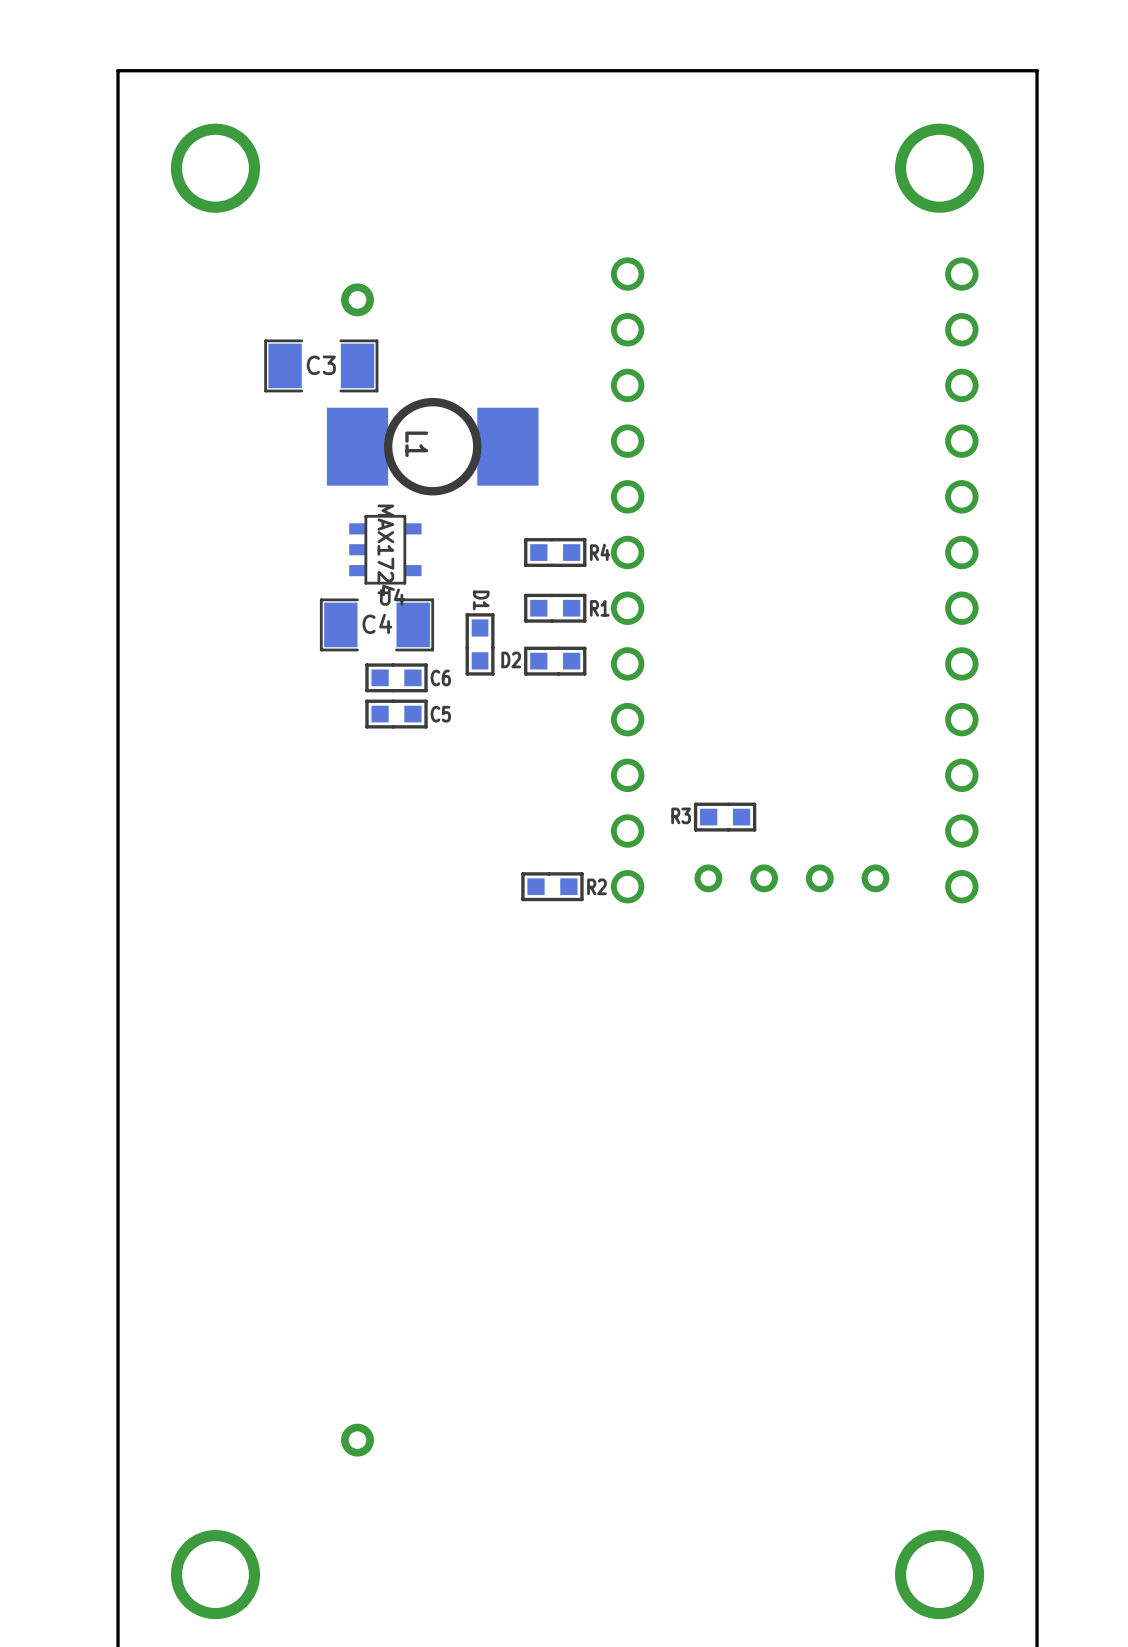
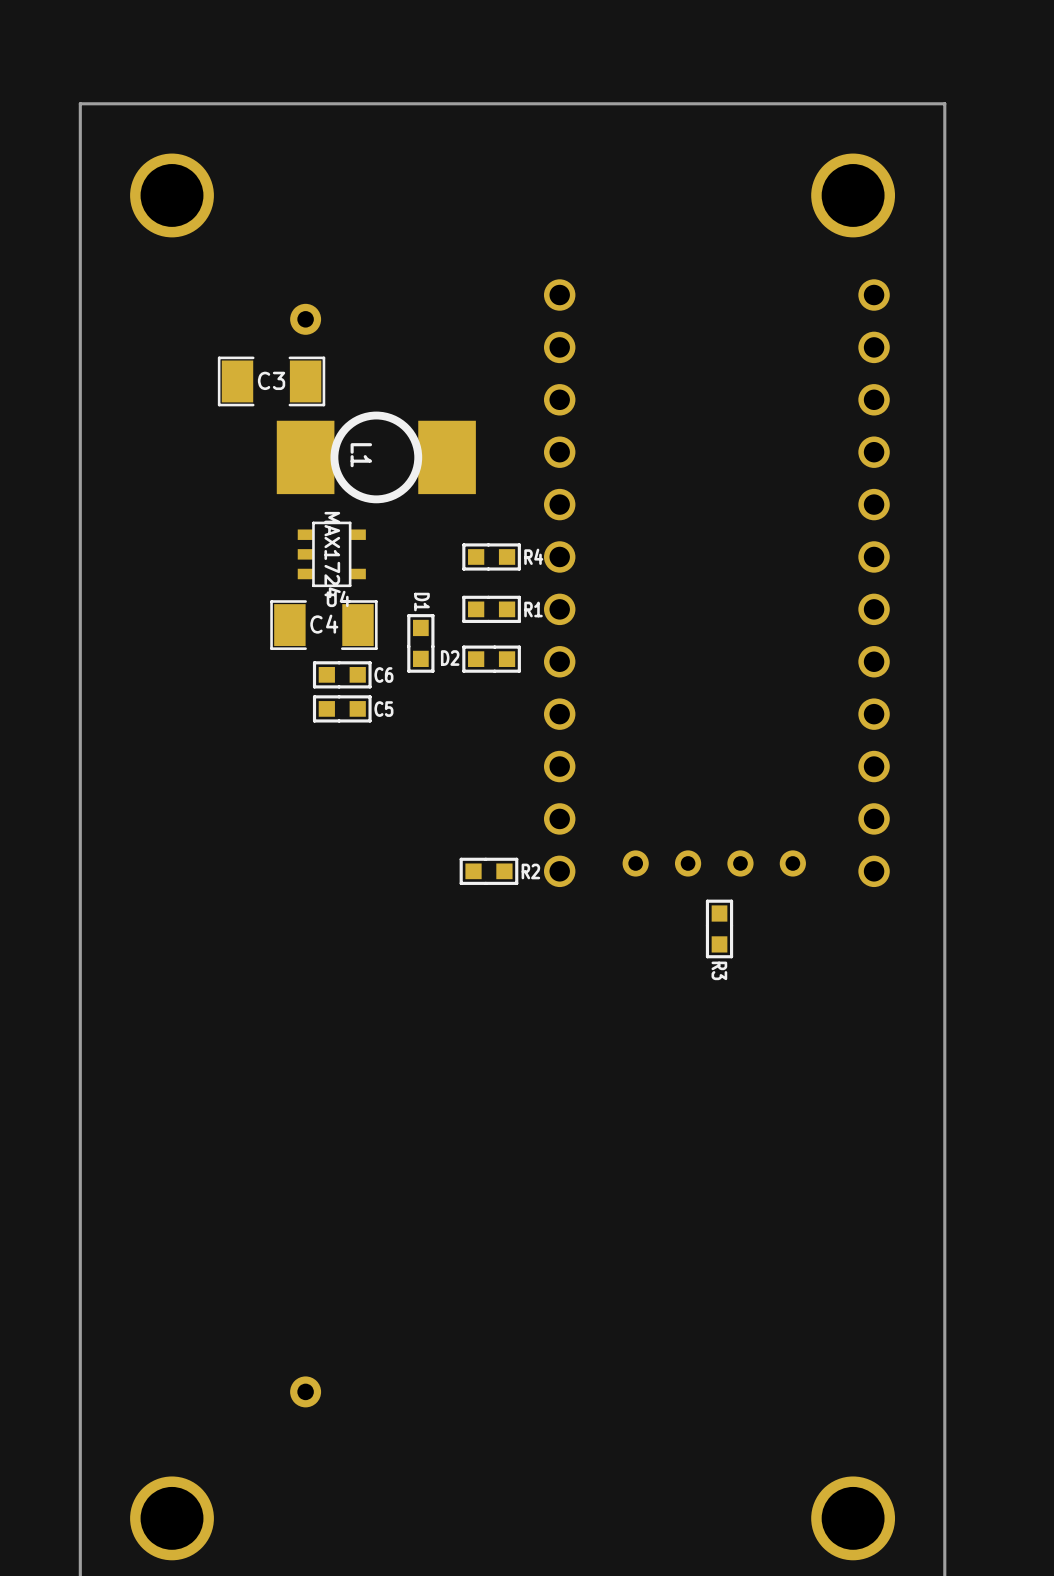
R3 rotation: 0° (725, 817) -> 90° counterclockwise (719, 928)
R3 position: (725, 817) -> (719, 928)

